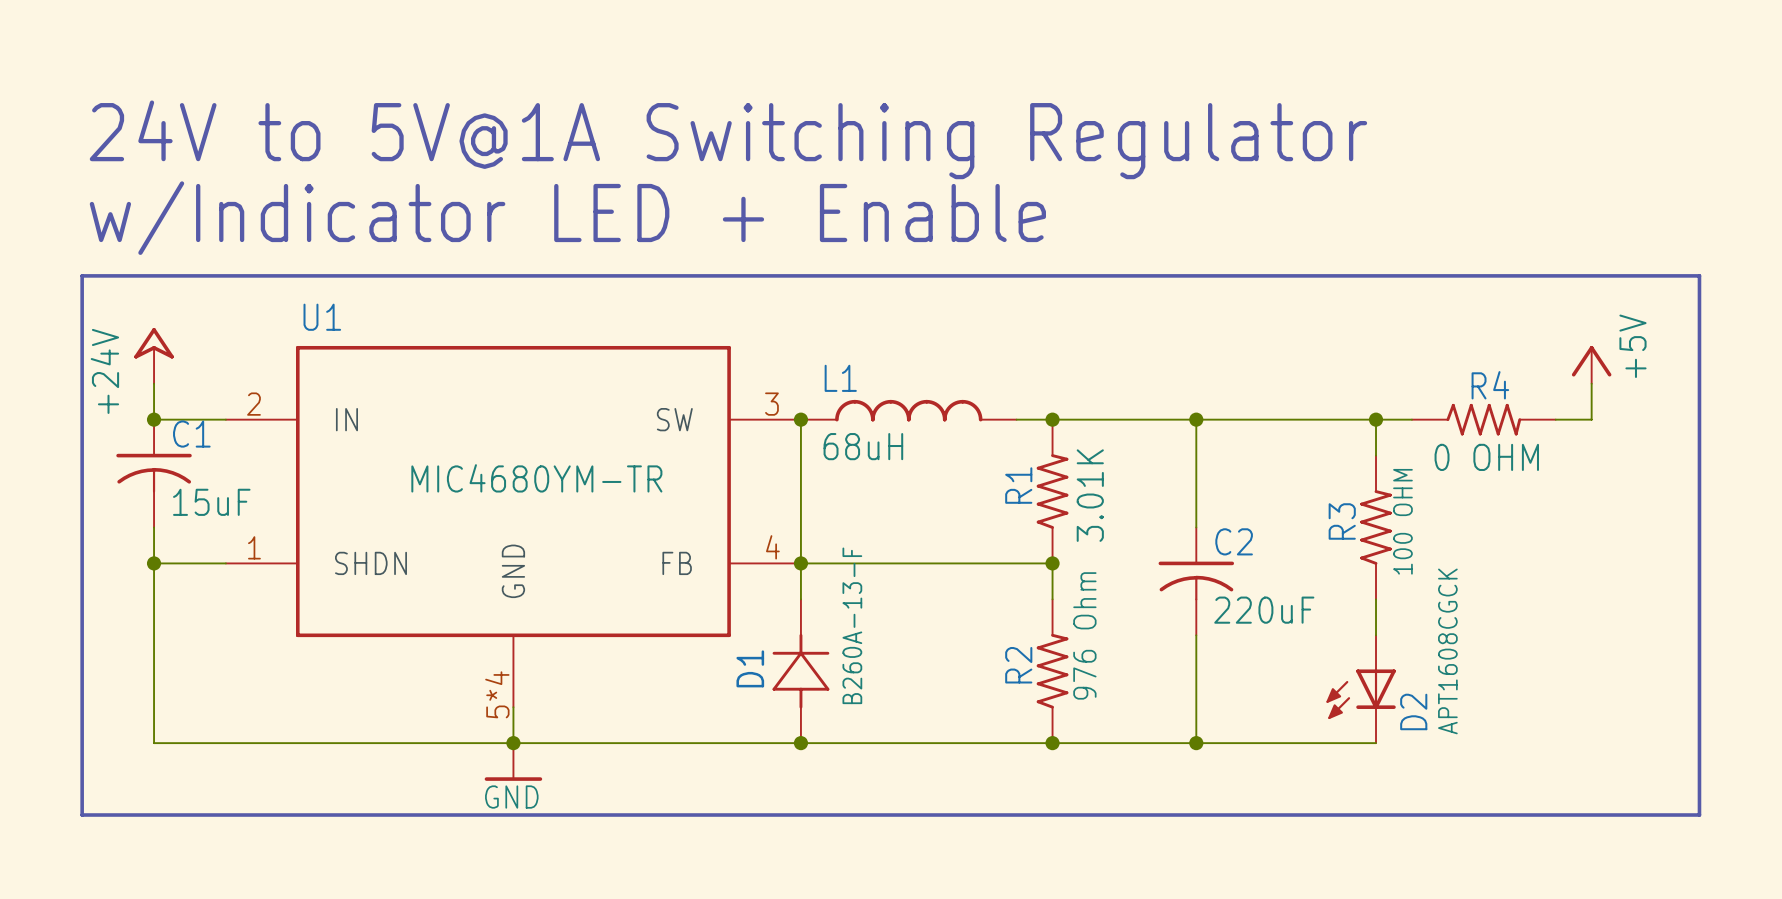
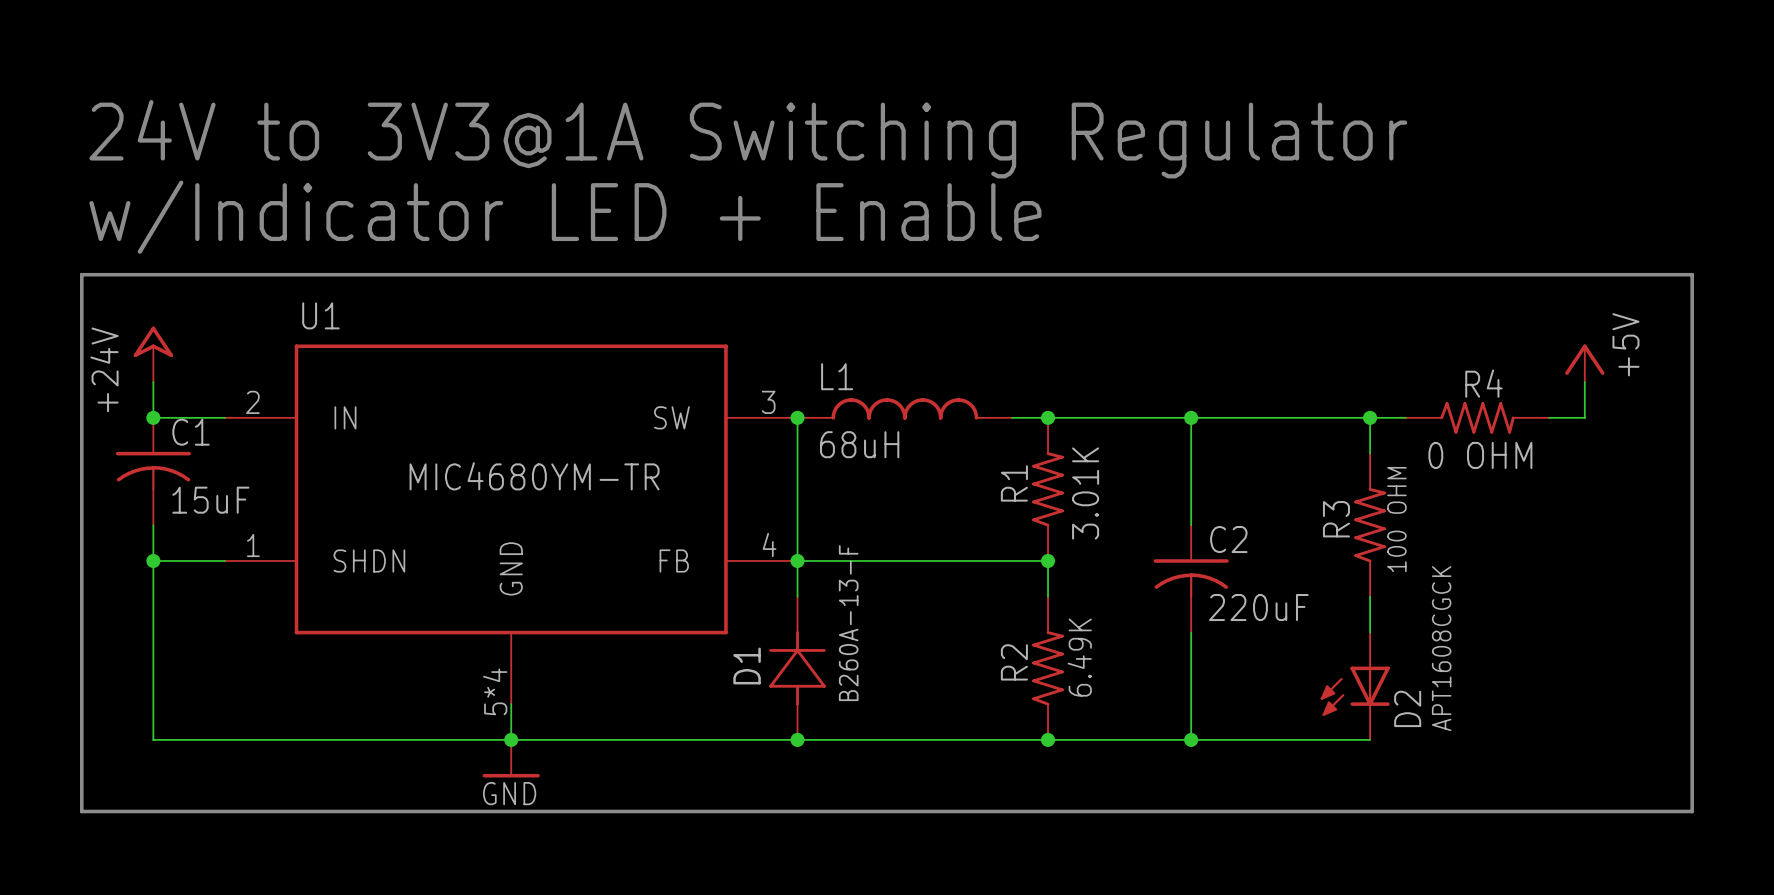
text: 24V to 5V@1A Switching Regulator (728, 139) -> 24V to 3V3@1A Switching Regulator (748, 139)
R2 value: 976 Ohm (1084, 635) -> 6.49K (1079, 657)

